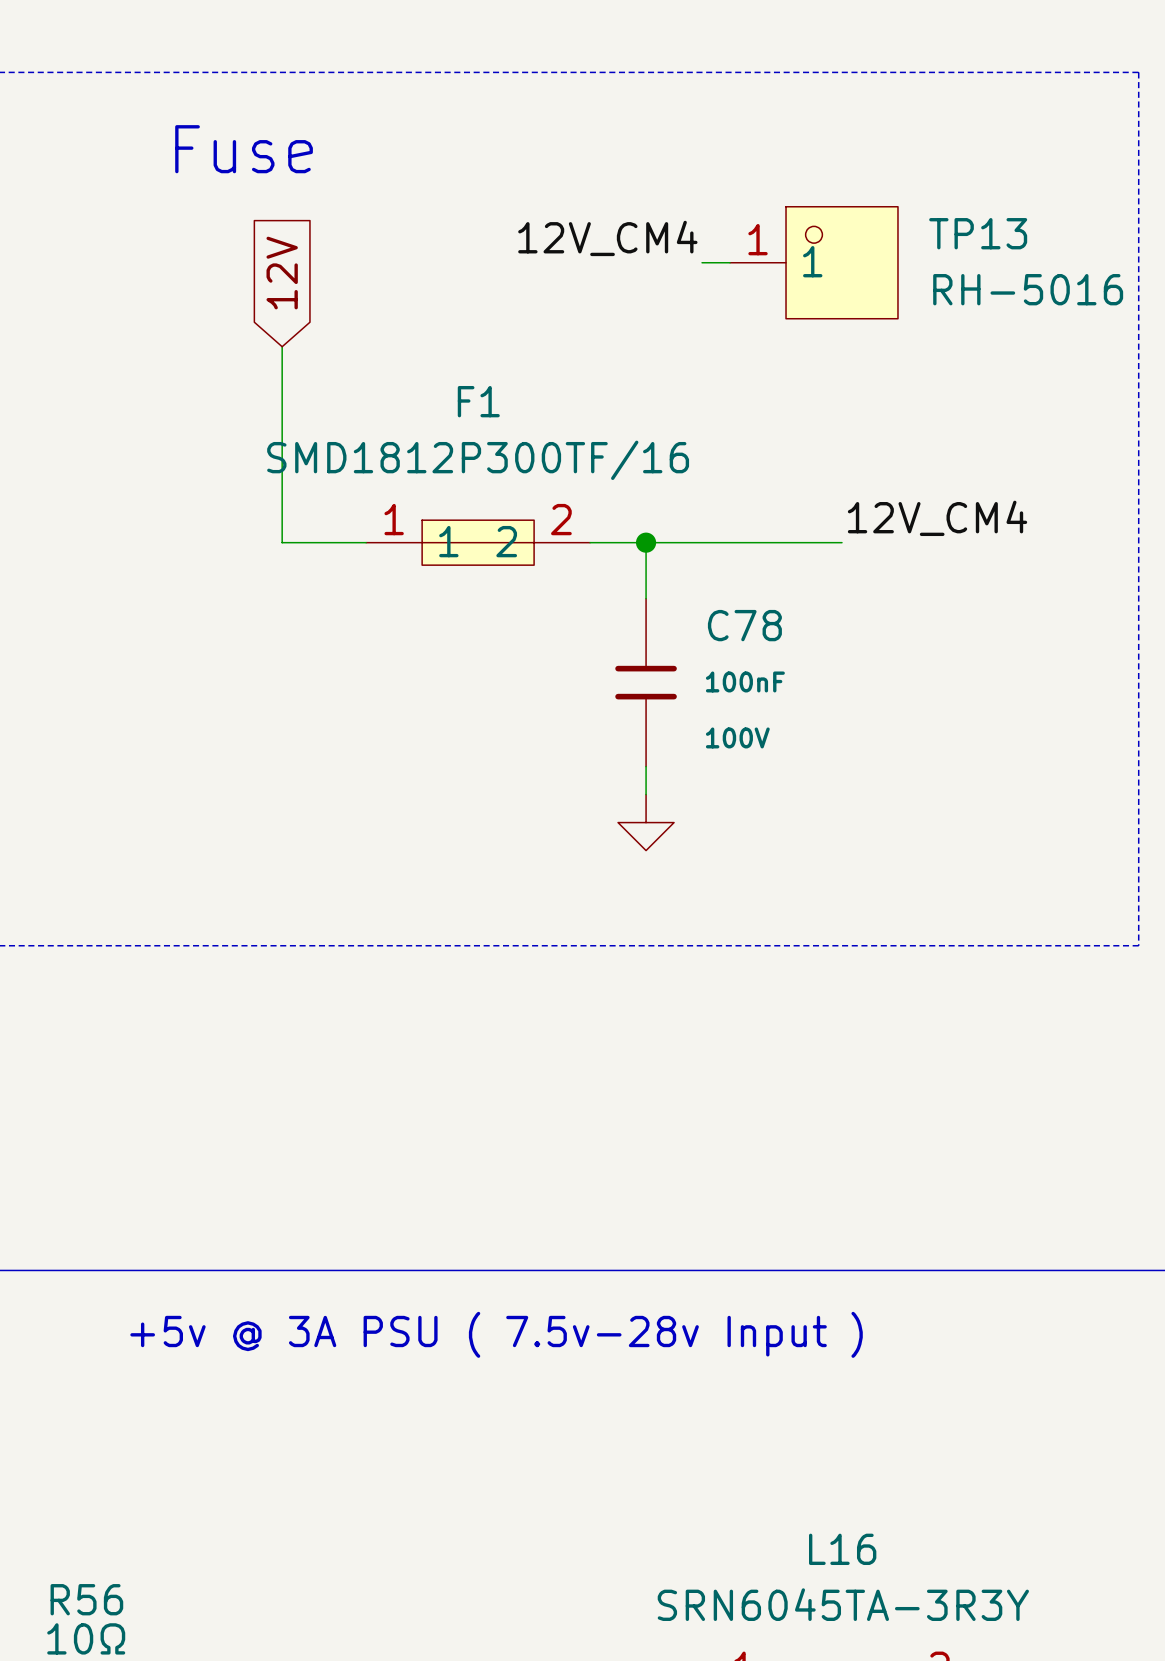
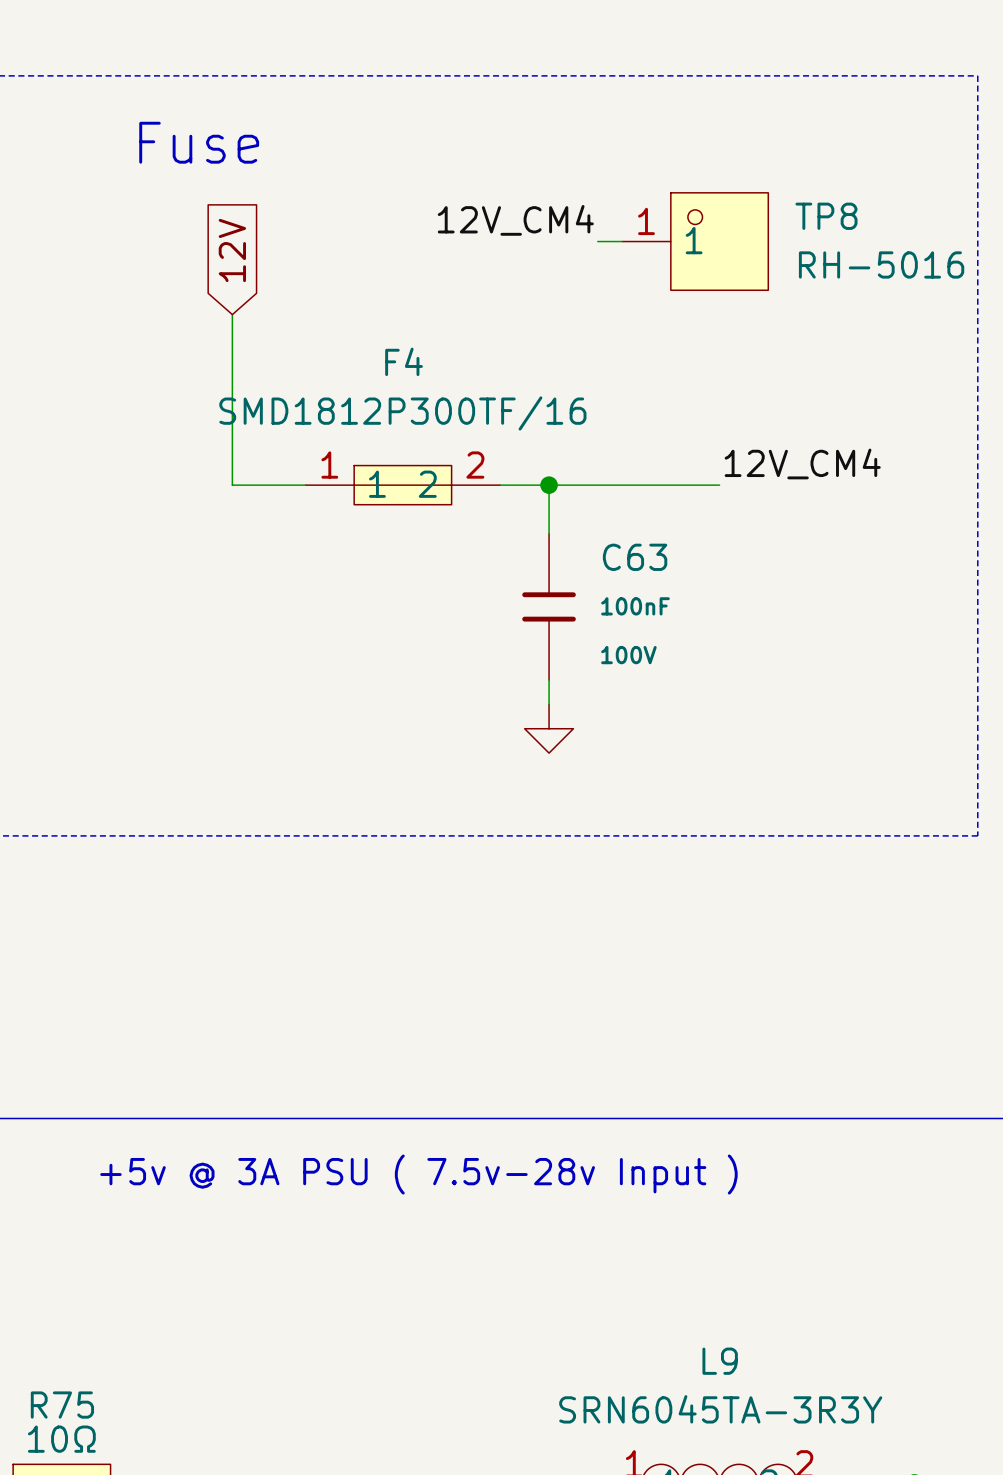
TP13 name: TP13 (978, 233) -> TP8 (826, 216)
F1 name: F1 (478, 401) -> F4 (404, 361)
C78 name: C78 (744, 625) -> C63 (635, 557)
L16 name: L16 (842, 1549) -> L9 (720, 1361)
R56 name: R56 (86, 1599) -> R75 (62, 1405)

